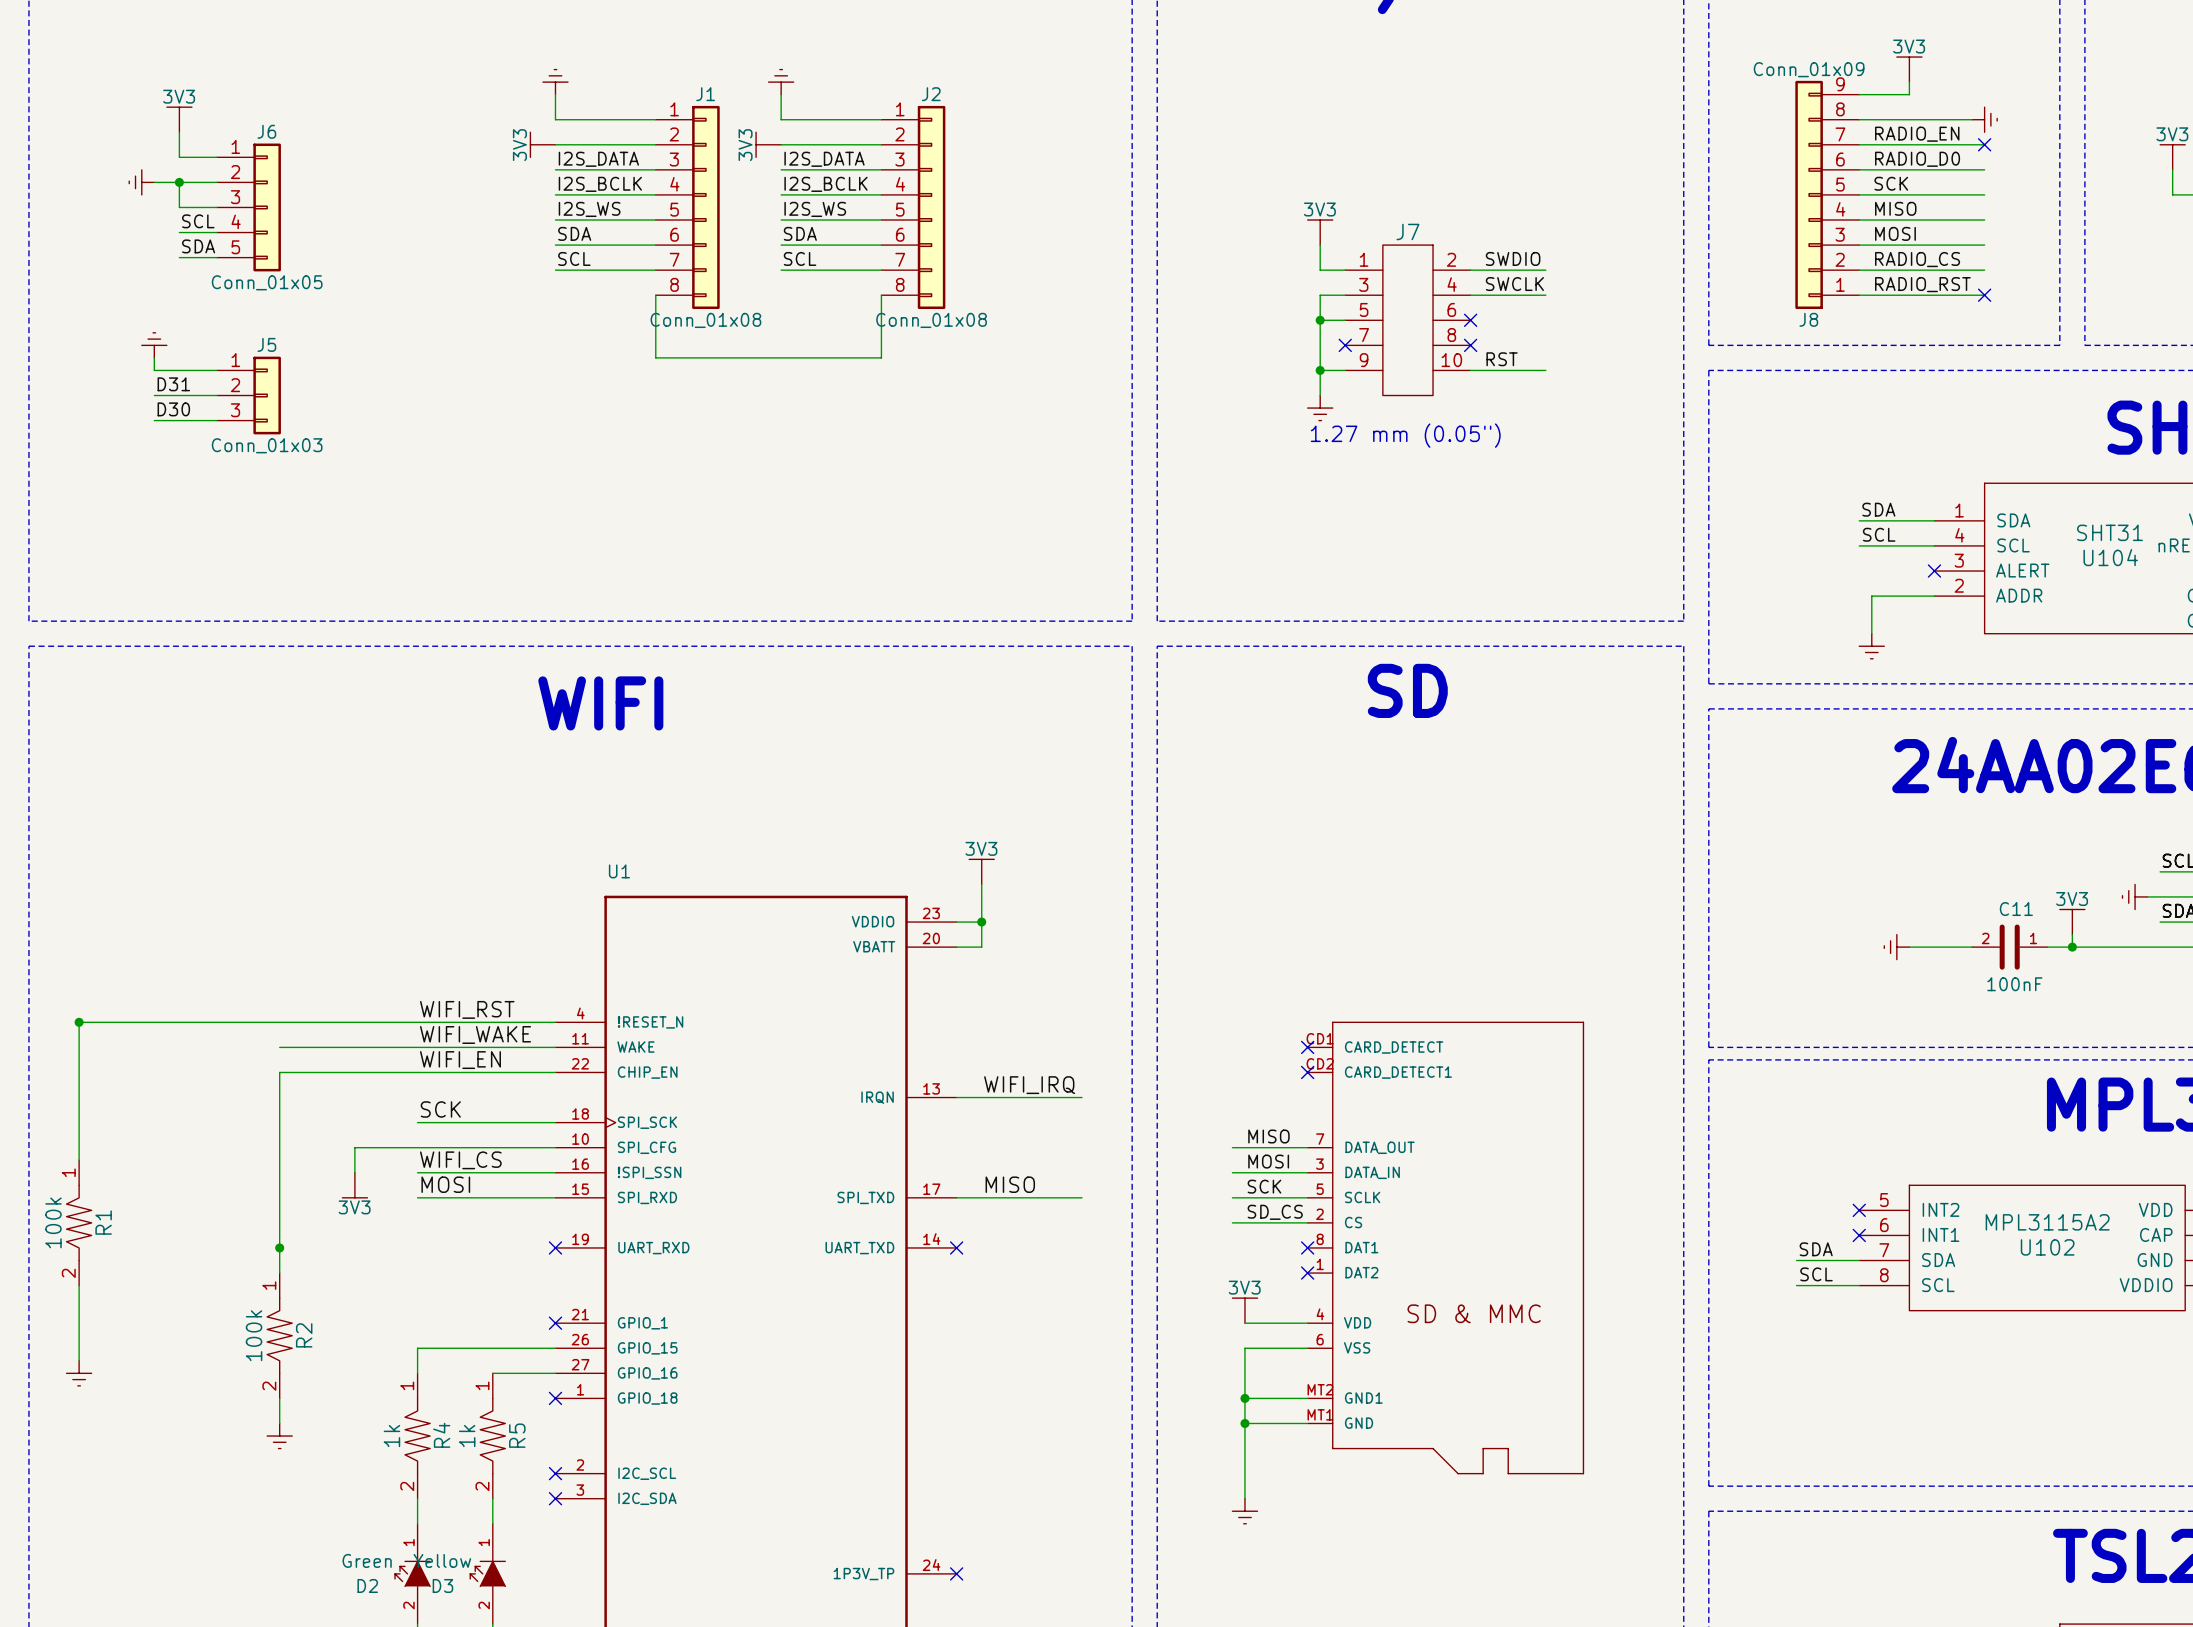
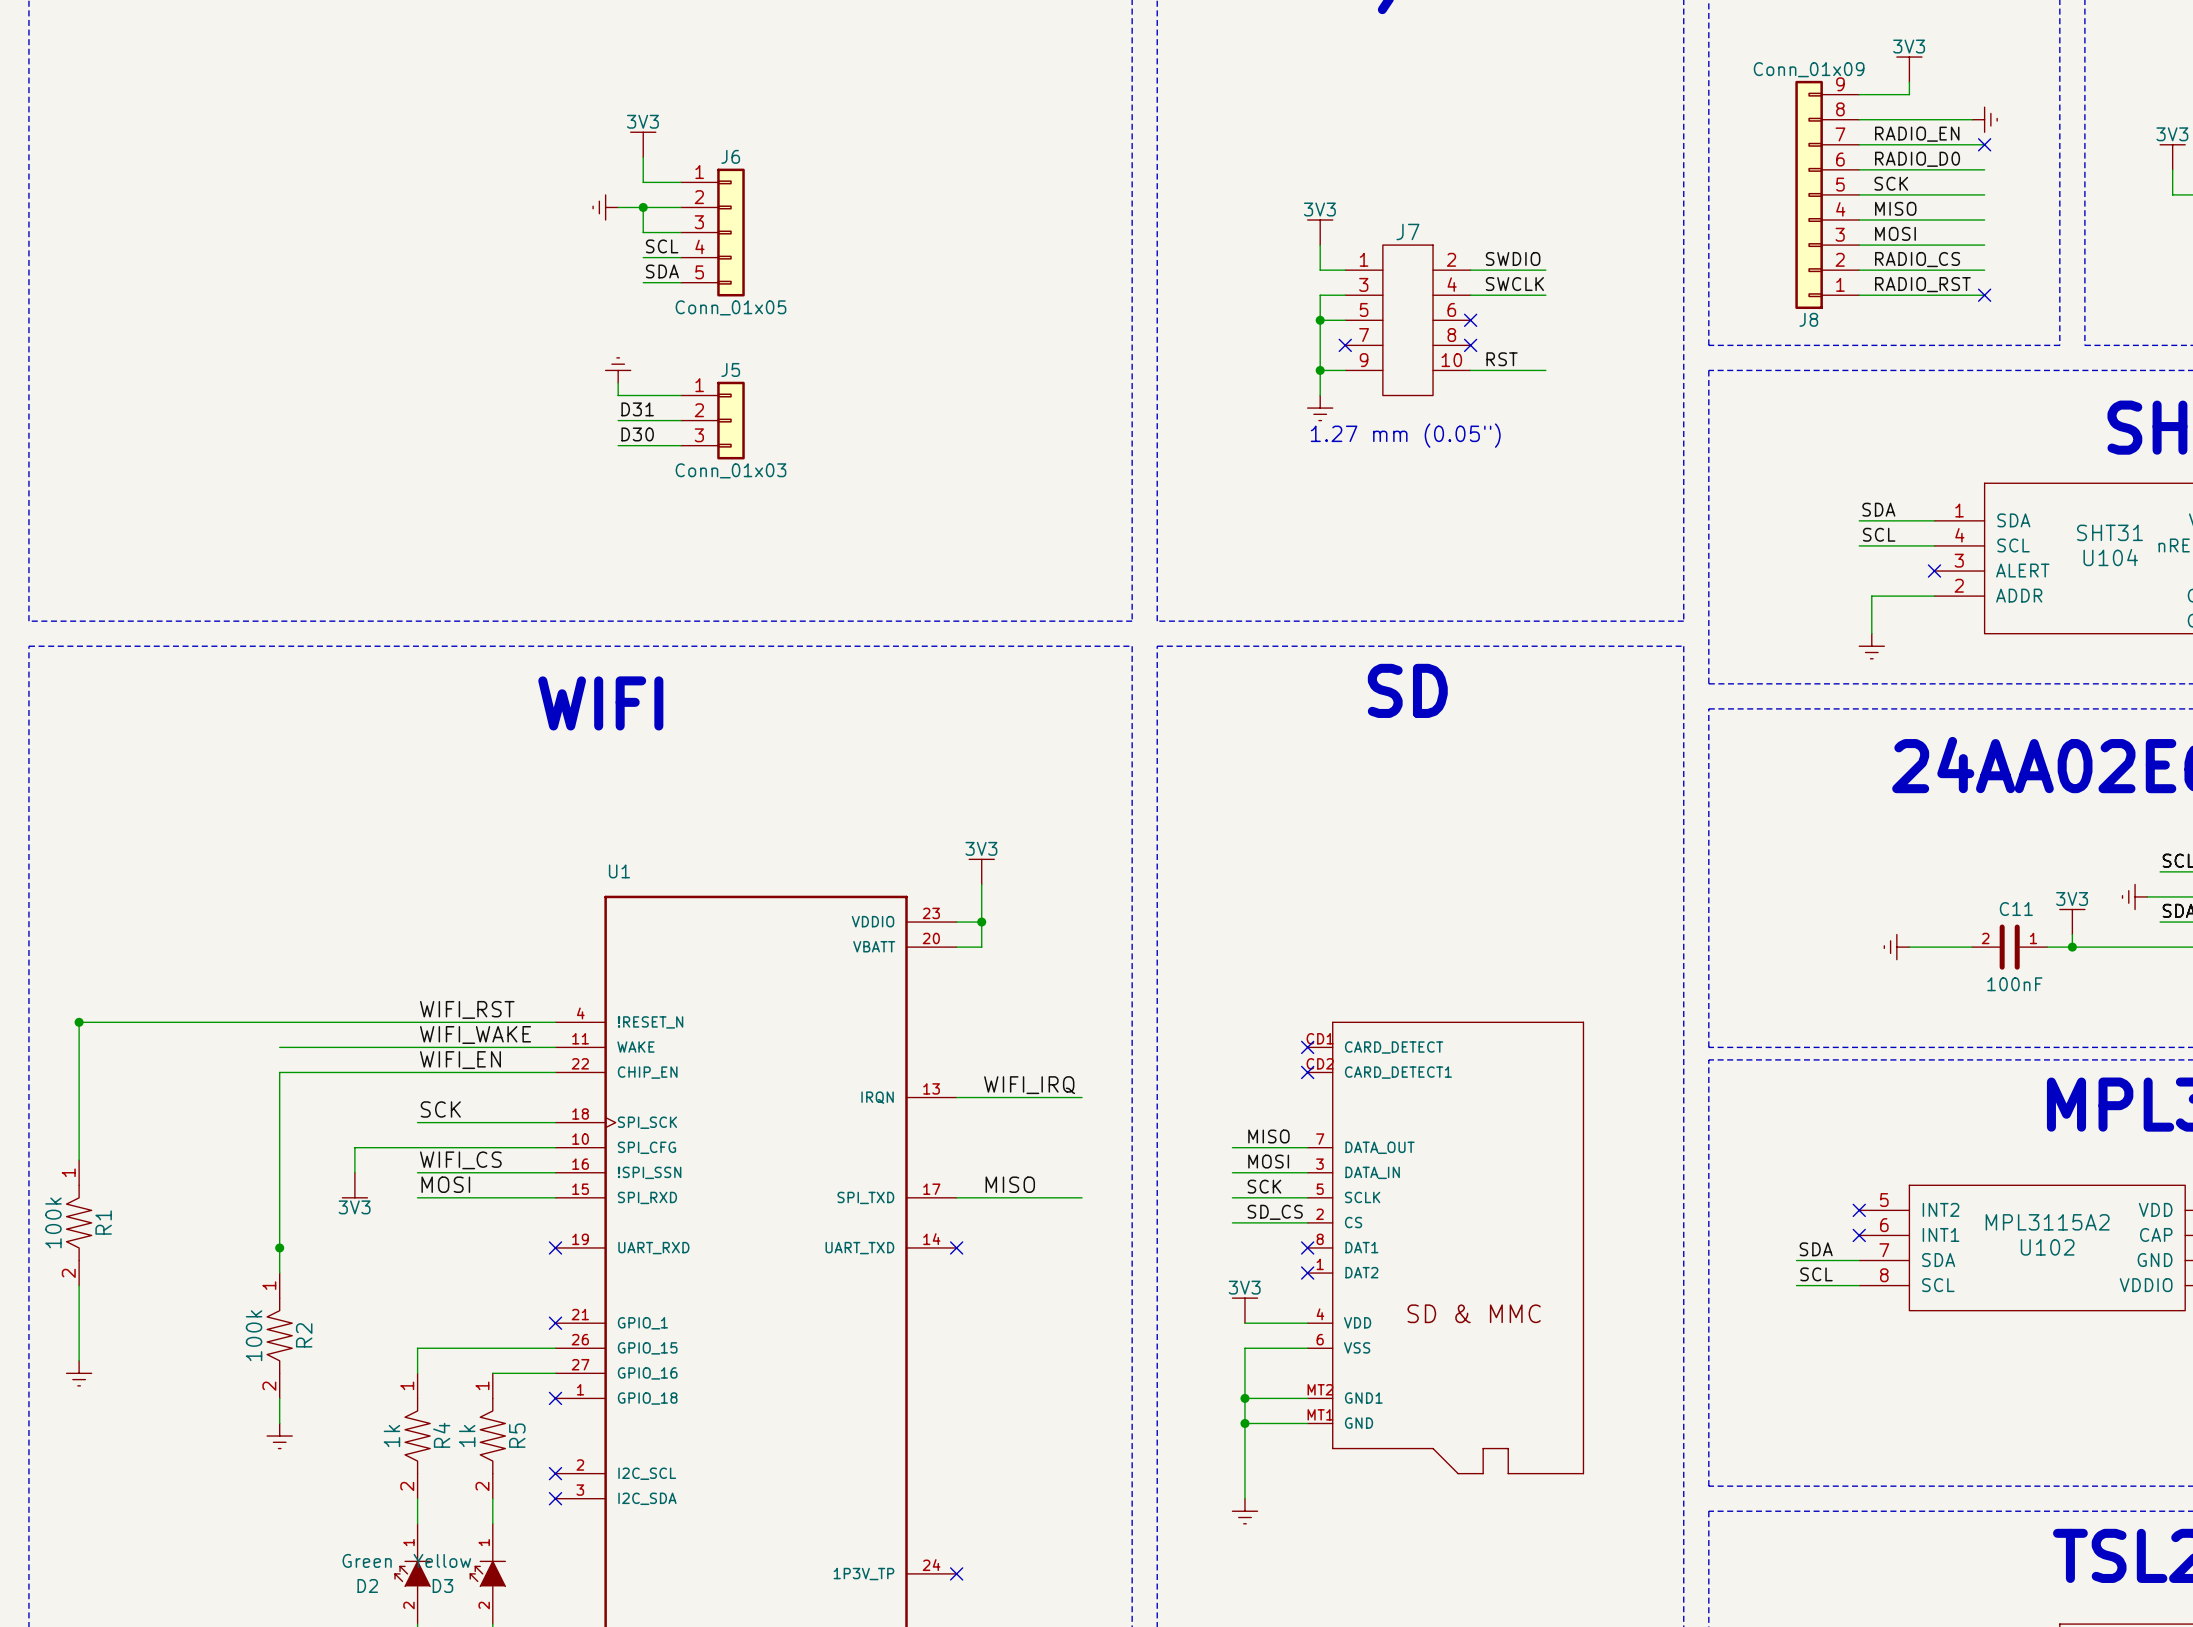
power symbol: (555, 82) -> none
power symbol: (781, 82) -> none
wire: (555, 94) (555, 119) (655, 119) -> none
wire: (781, 94) (781, 119) (881, 119) -> none
power symbol: 3V3 (179, 119) -> none
wire: (179, 132) (179, 157) (217, 157) -> none
power symbol: 3V3 (542, 144) -> none
wire: (555, 144) (655, 144) -> none
power symbol: none -> 3V3 (643, 144)
power symbol: 3V3 (768, 144) -> none
wire: (781, 144) (881, 144) -> none
wire: none -> (643, 157) (643, 182) (680, 182)
label: I2S_DATA (598, 159) -> none
label: I2S_DATA (824, 159) -> none
wire: (555, 169) (655, 169) -> none
wire: (781, 169) (881, 169) -> none
power symbol: (141, 182) -> none
wire: (154, 182) (217, 182) -> none
wire: (179, 182) (179, 207) (217, 207) -> none
junction: (179, 182) -> none
label: I2S_BCLK (600, 184) -> none
label: I2S_BCLK (826, 184) -> none
wire: (555, 194) (655, 194) -> none
wire: (781, 194) (881, 194) -> none
J6 position: (248, 207) -> (712, 232)
power symbol: none -> (605, 207)
wire: none -> (618, 207) (680, 207)
wire: none -> (643, 207) (643, 232) (680, 232)
junction: none -> (643, 207)
J1: Conn_01x08 (687, 207) -> none
J2: Conn_01x08 (913, 207) -> none
label: I2S_WS (589, 209) -> none
label: I2S_WS (815, 209) -> none
wire: (555, 220) (655, 220) -> none
wire: (781, 220) (881, 220) -> none
label: SCL (198, 221) -> none
wire: (179, 232) (217, 232) -> none
label: SDA (574, 233) -> none
label: SDA (800, 233) -> none
wire: (555, 245) (655, 245) -> none
wire: (781, 245) (881, 245) -> none
label: SDA (198, 246) -> none
label: none -> SCL (662, 246)
wire: (179, 257) (217, 257) -> none
wire: none -> (643, 257) (680, 257)
label: SCL (574, 258) -> none
label: SCL (800, 258) -> none
wire: (555, 270) (655, 270) -> none
wire: (781, 270) (881, 270) -> none
label: none -> SDA (662, 271)
wire: none -> (643, 282) (680, 282)
wire: (655, 295) (655, 357) (881, 357) (881, 295) -> none
power symbol: (154, 345) -> none
wire: (154, 357) (154, 370) (217, 370) -> none
power symbol: none -> (618, 370)
wire: none -> (618, 382) (618, 395) (680, 395)
label: D31 (173, 384) -> none
wire: (154, 395) (217, 395) -> none
J5 position: (248, 395) -> (712, 420)
label: D30 (173, 409) -> none
label: none -> D31 (637, 409)
wire: (154, 420) (217, 420) -> none
wire: none -> (618, 420) (680, 420)
label: none -> D30 (637, 434)
wire: none -> (618, 445) (680, 445)

